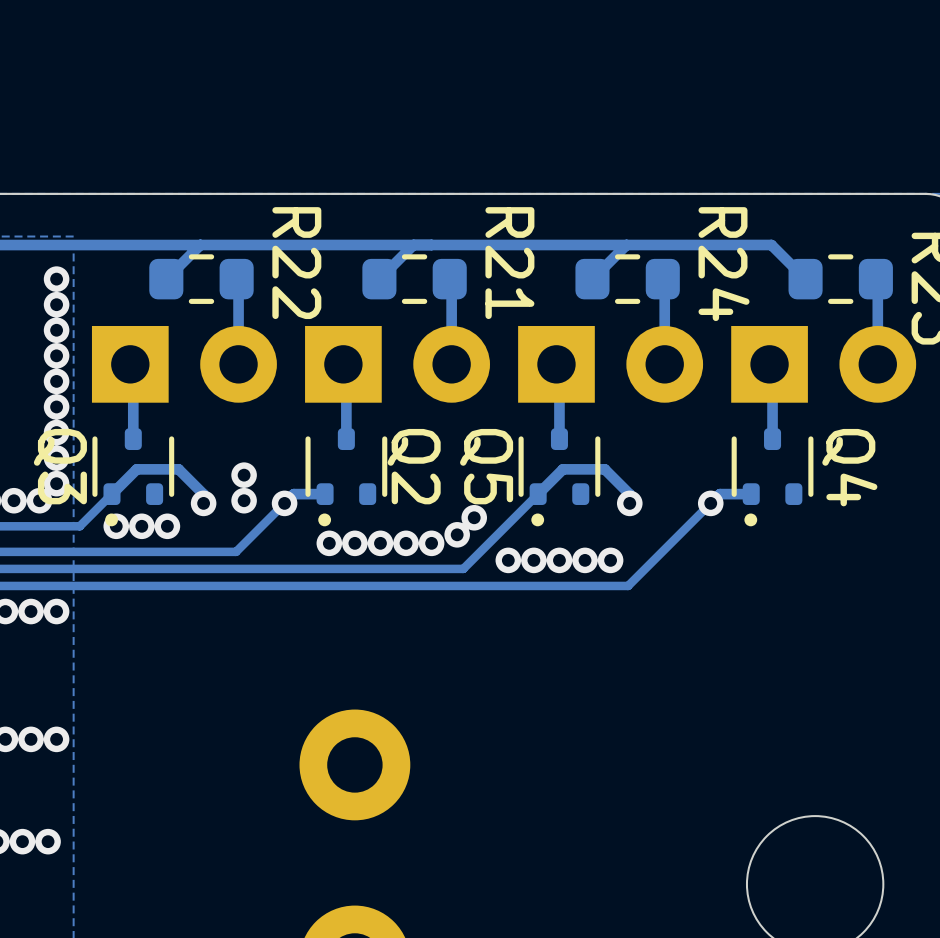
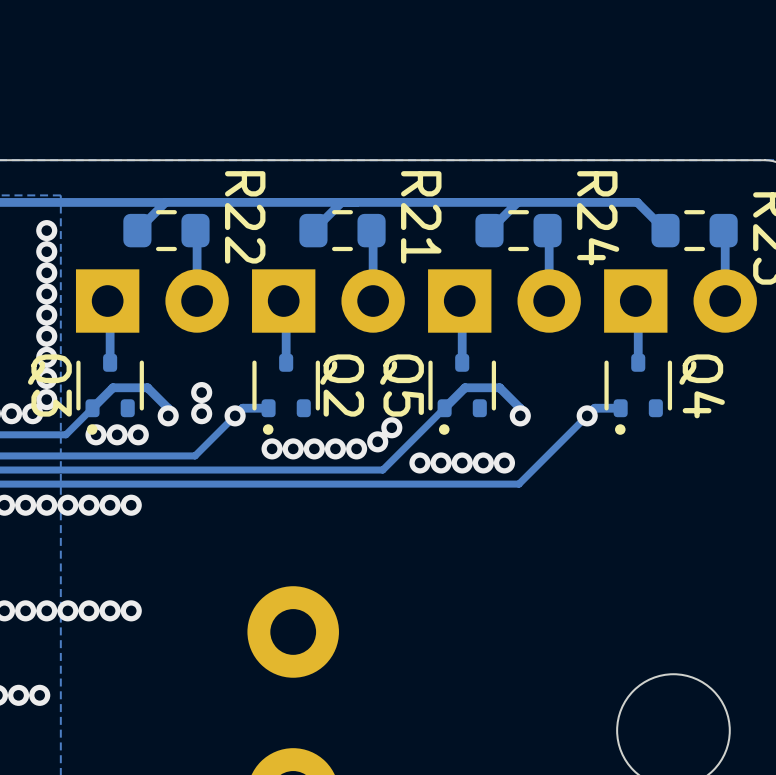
via: none -> (67, 505)
via: none -> (89, 505)
via: none -> (110, 505)
via: none -> (131, 505)
via: none -> (67, 610)
via: none -> (89, 610)
via: none -> (110, 610)
via: none -> (131, 610)

